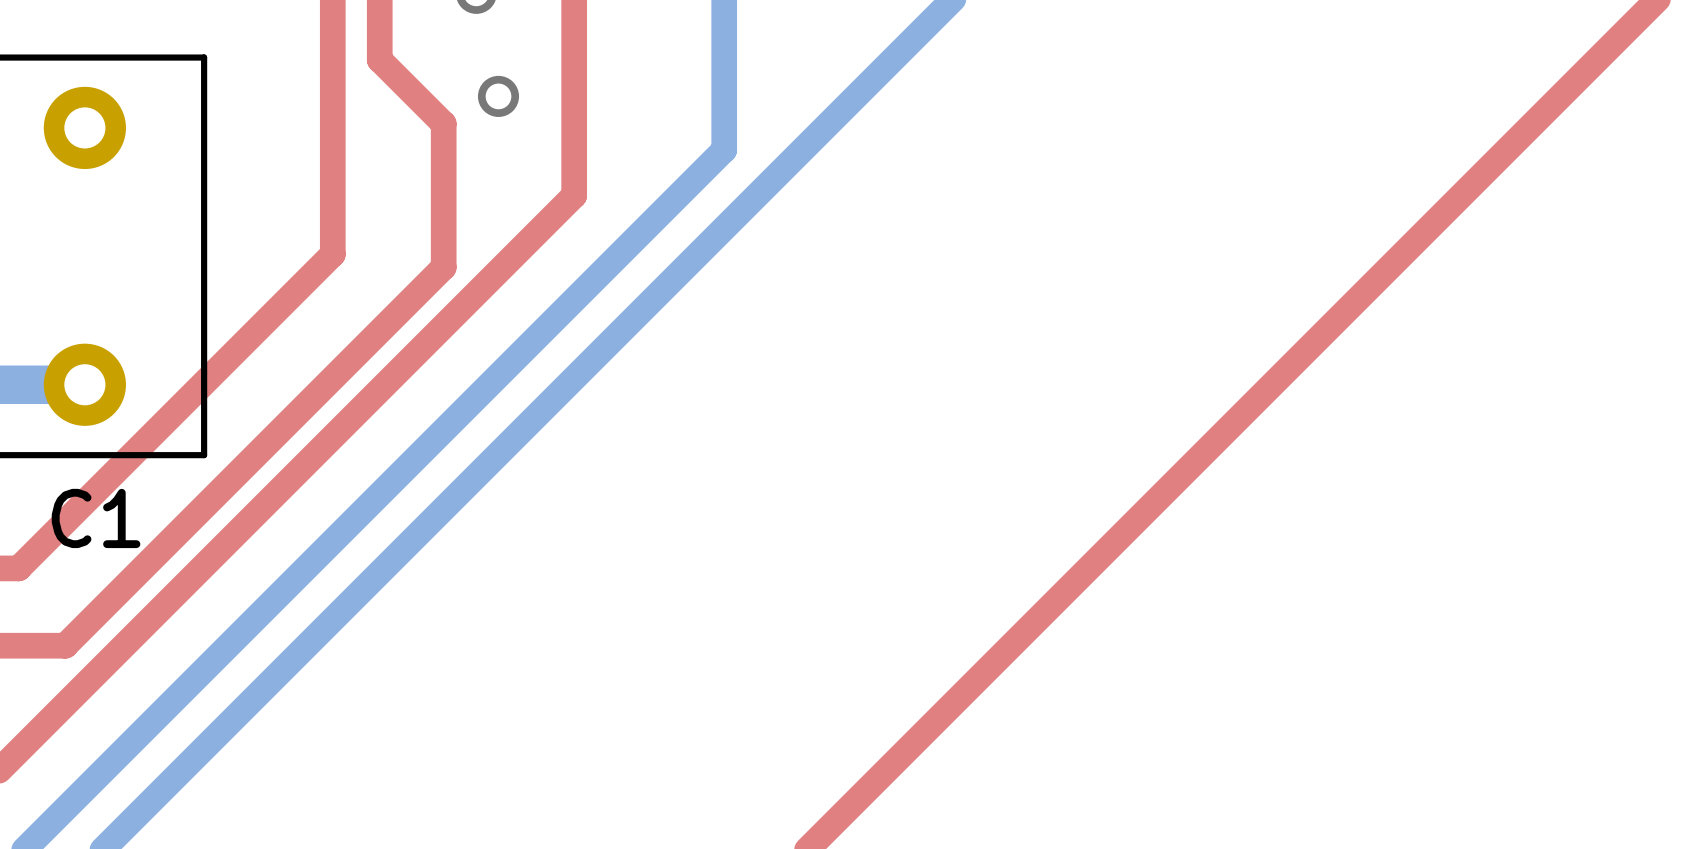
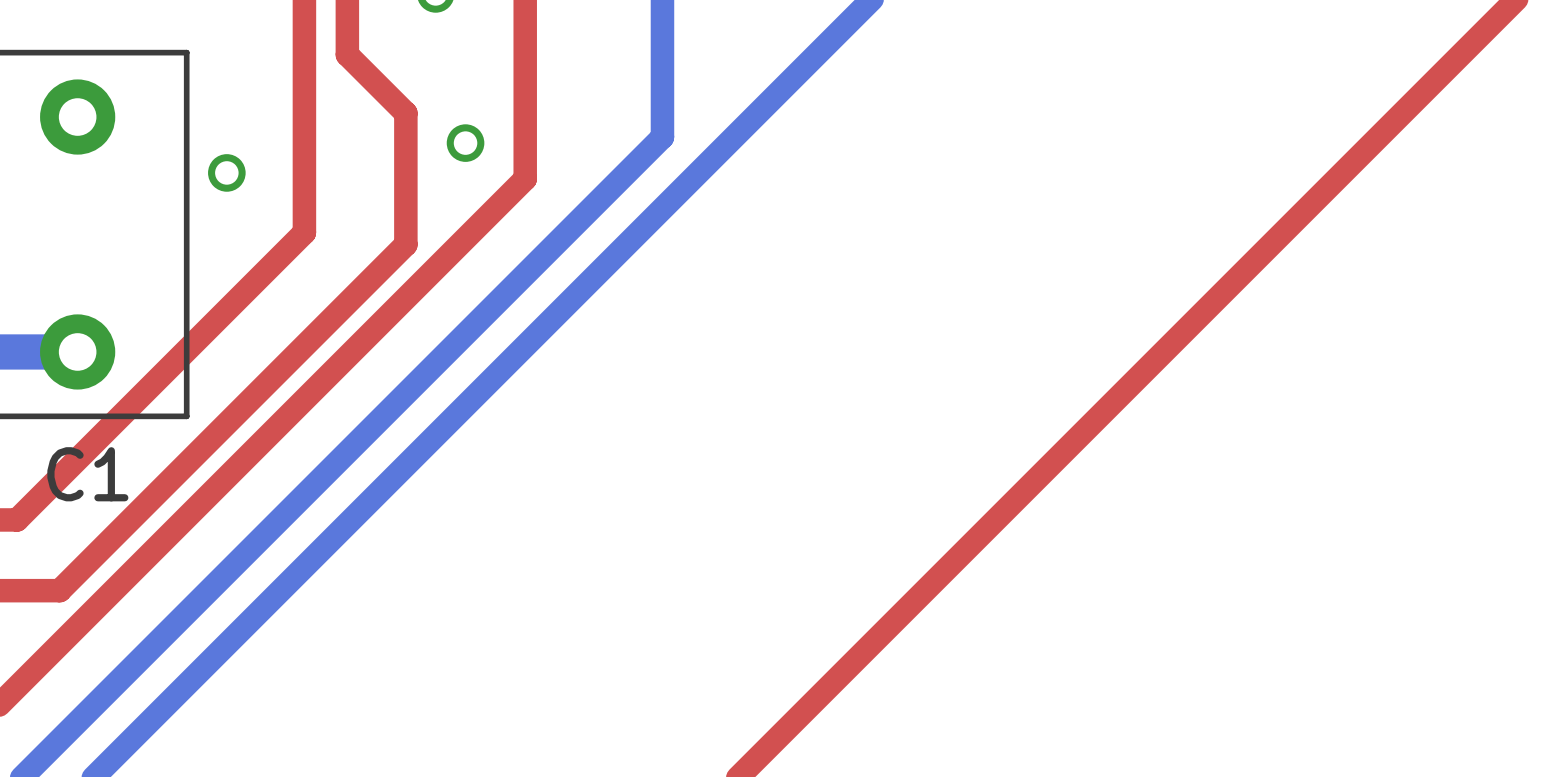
via position: (498, 96) -> (465, 143)
via: none -> (226, 172)

